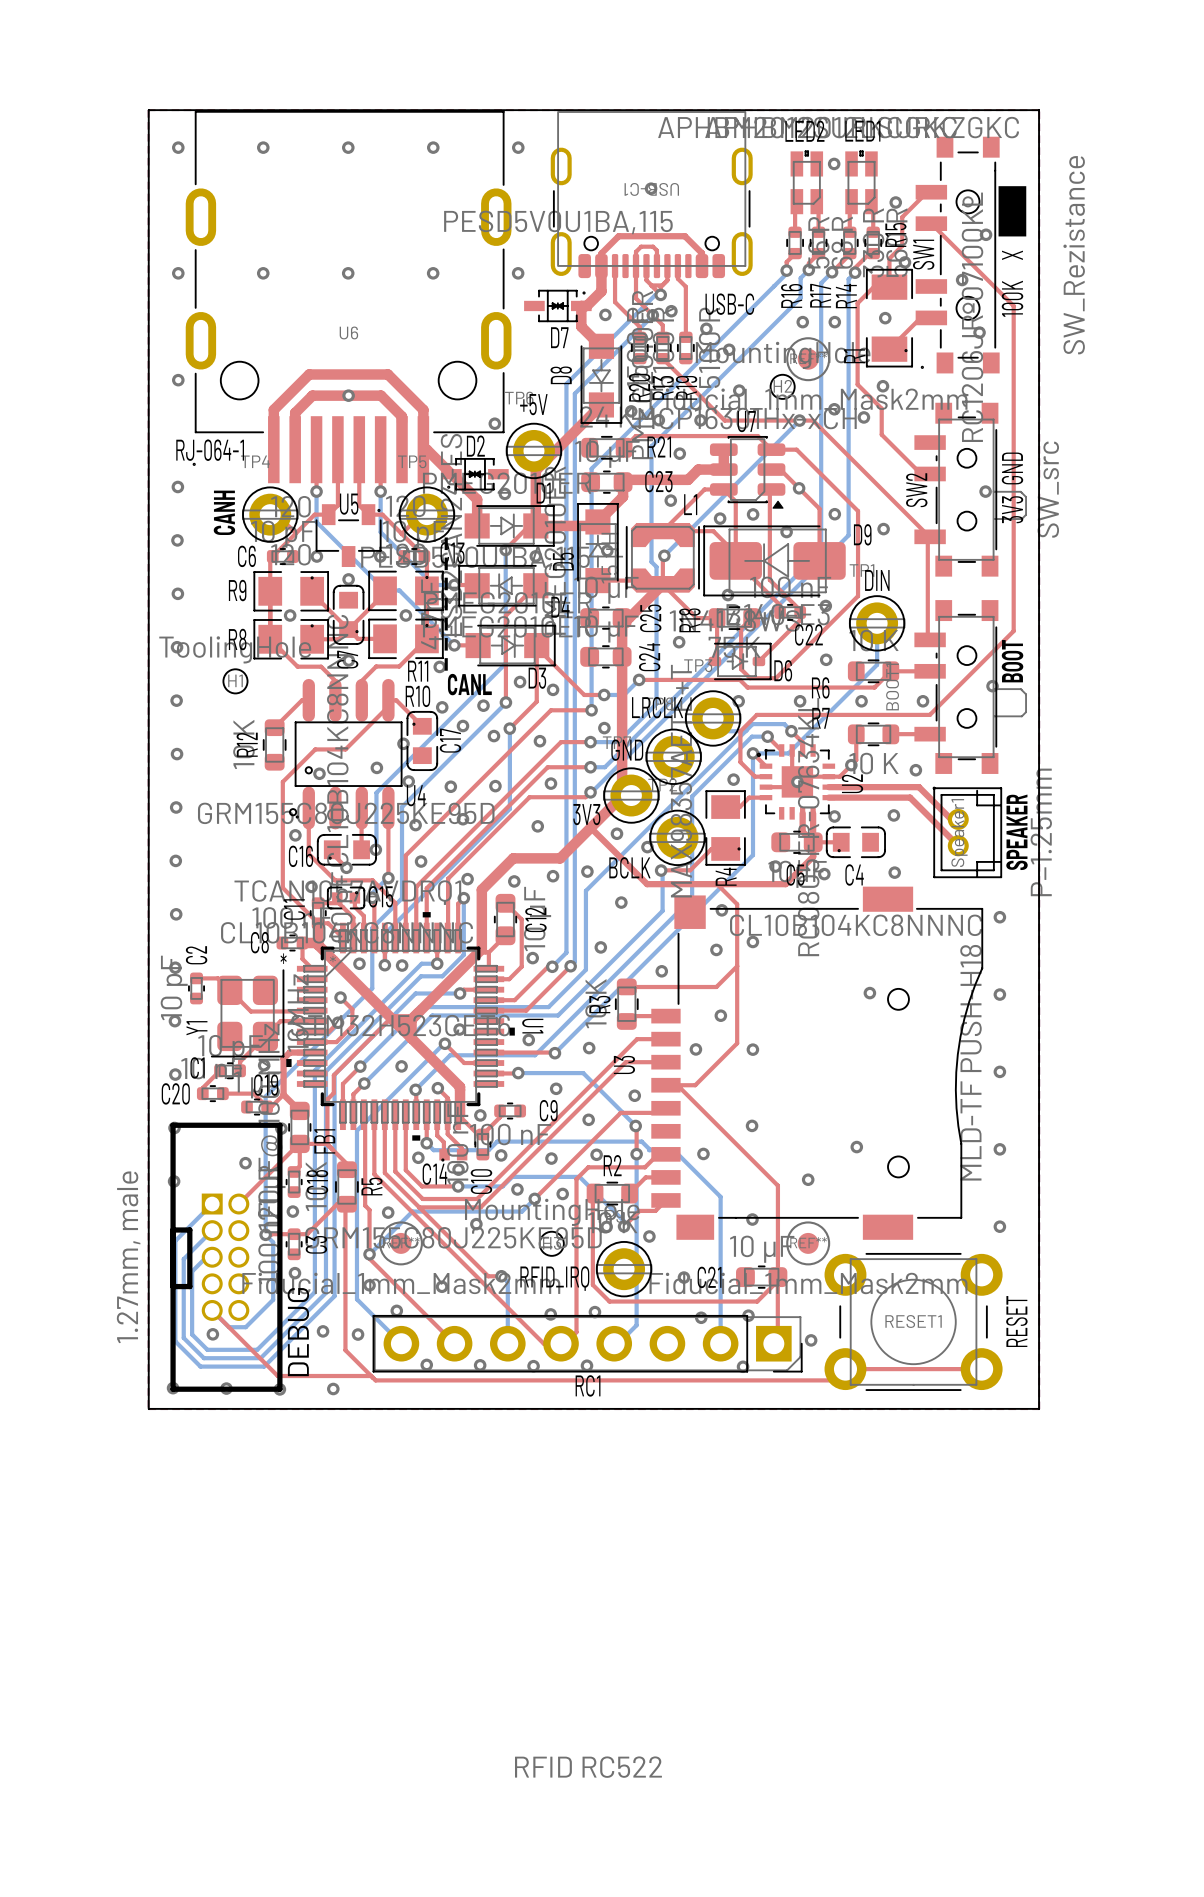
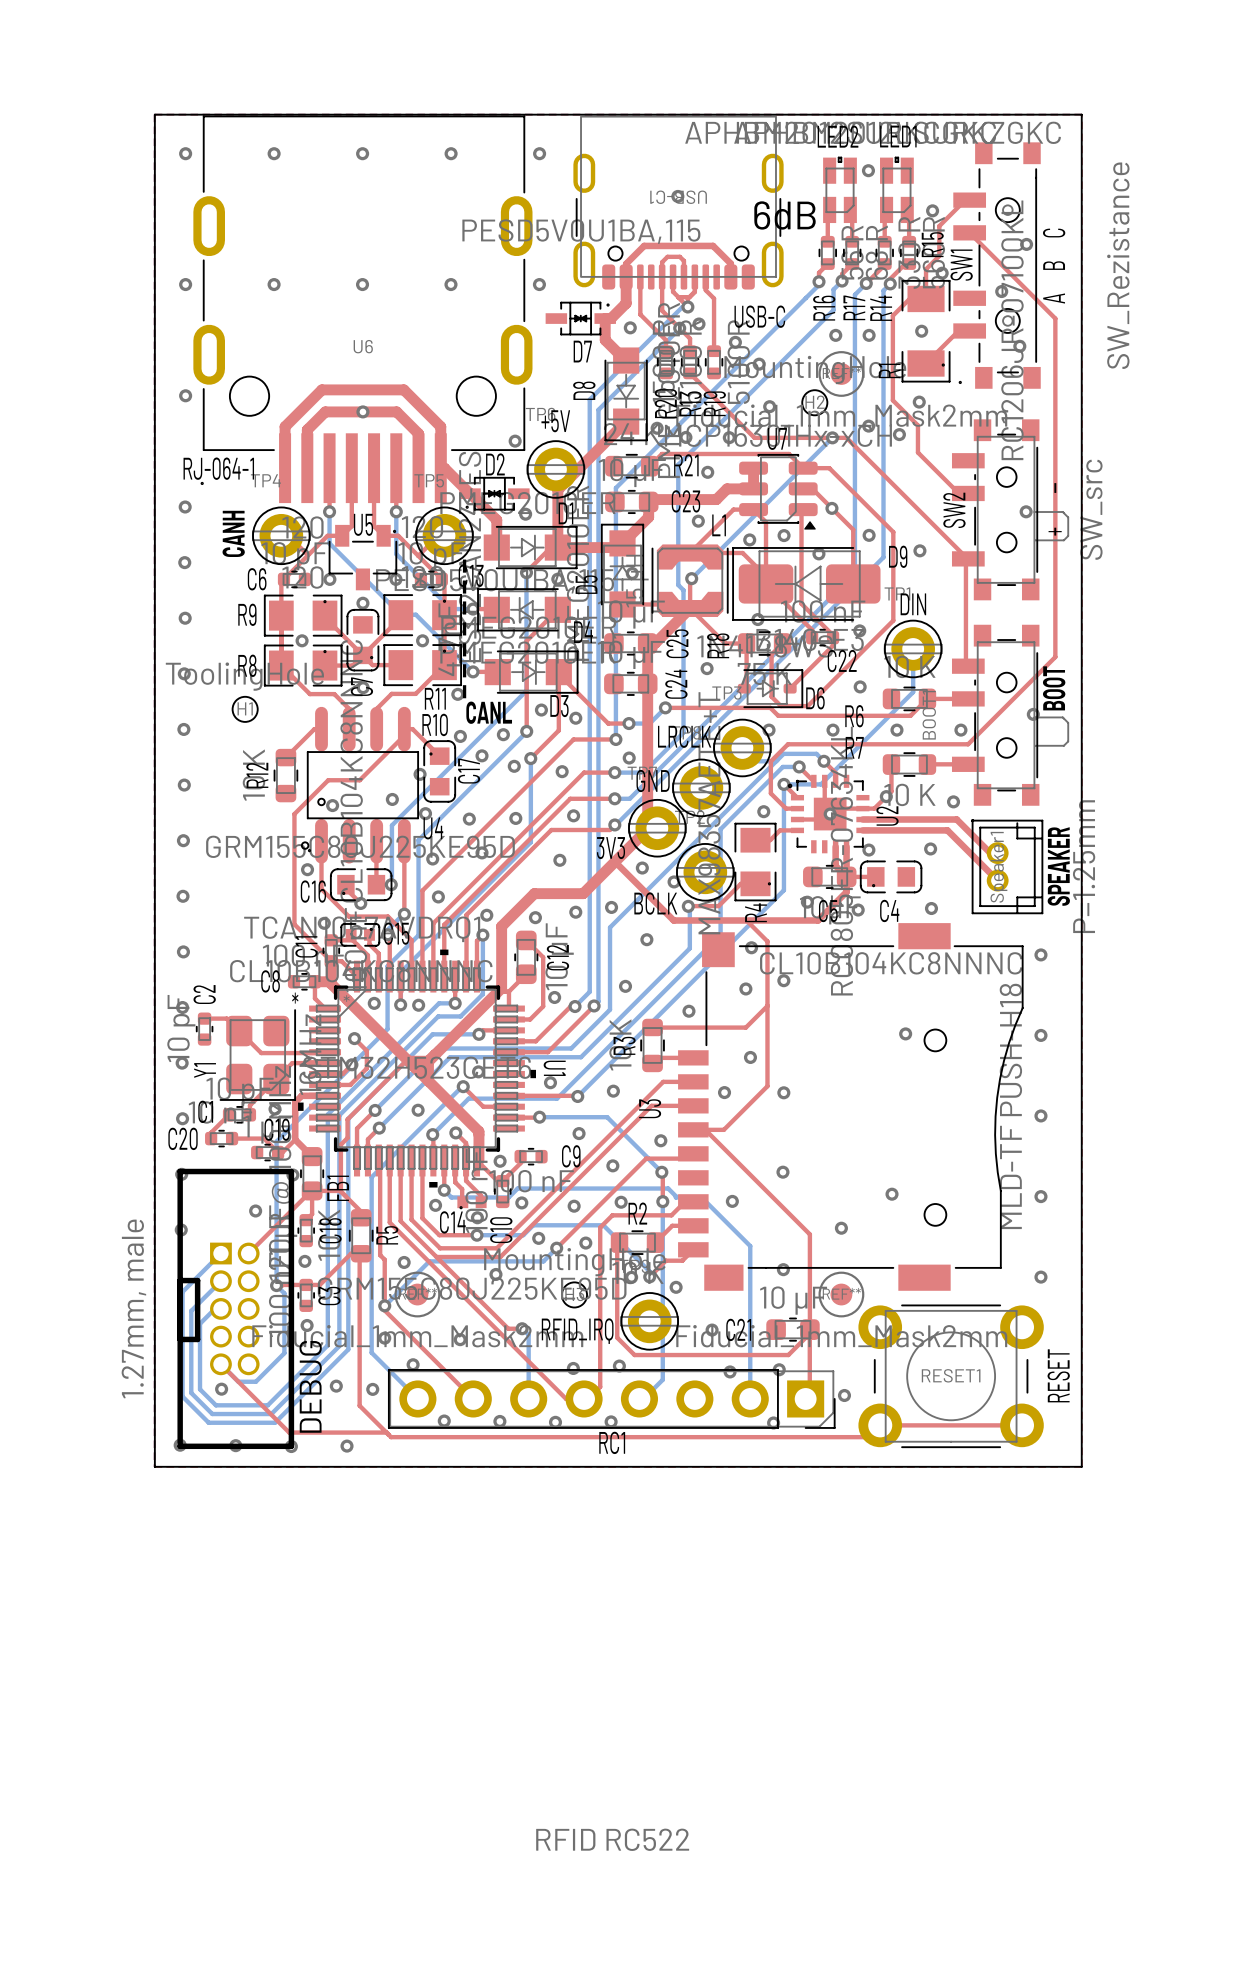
drawing: [998, 186, 1027, 237] -> none
text: none -> 6dB (785, 215)
text: none -> C (1054, 233)
text: X (1012, 255) -> B (1054, 265)
text: 100K (1012, 298) -> A (1054, 298)
text: GND (1012, 468) -> - (1055, 488)
text: 3V3 (1012, 509) -> + (1055, 531)

